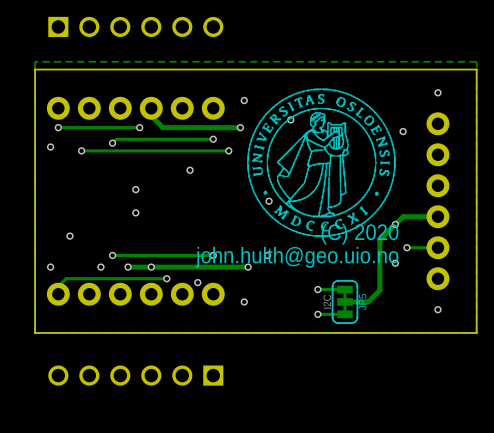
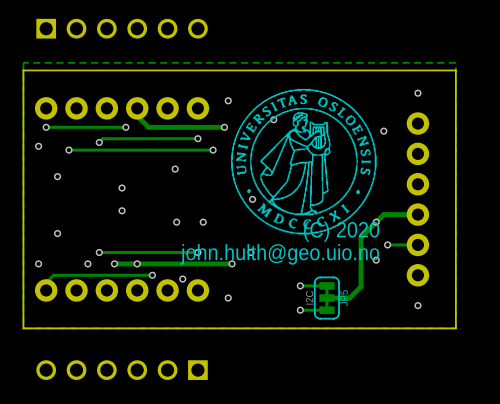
via: none -> (57, 176)
via: none -> (176, 222)
via: none -> (203, 222)

